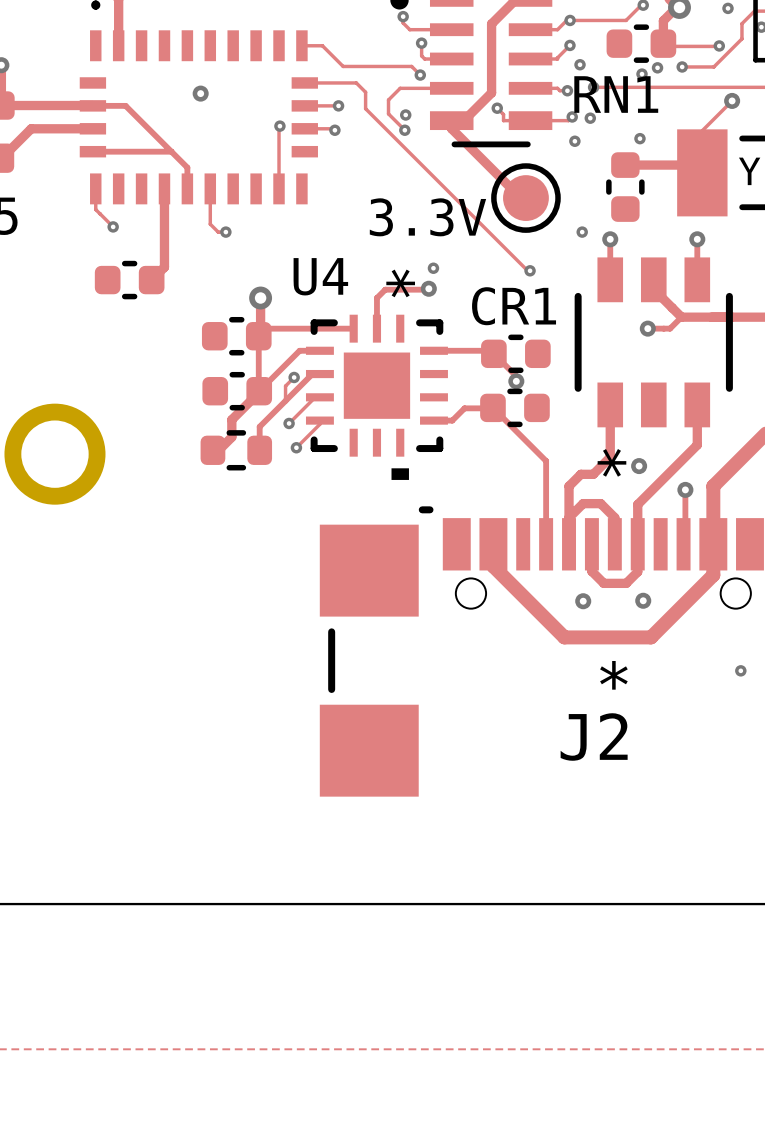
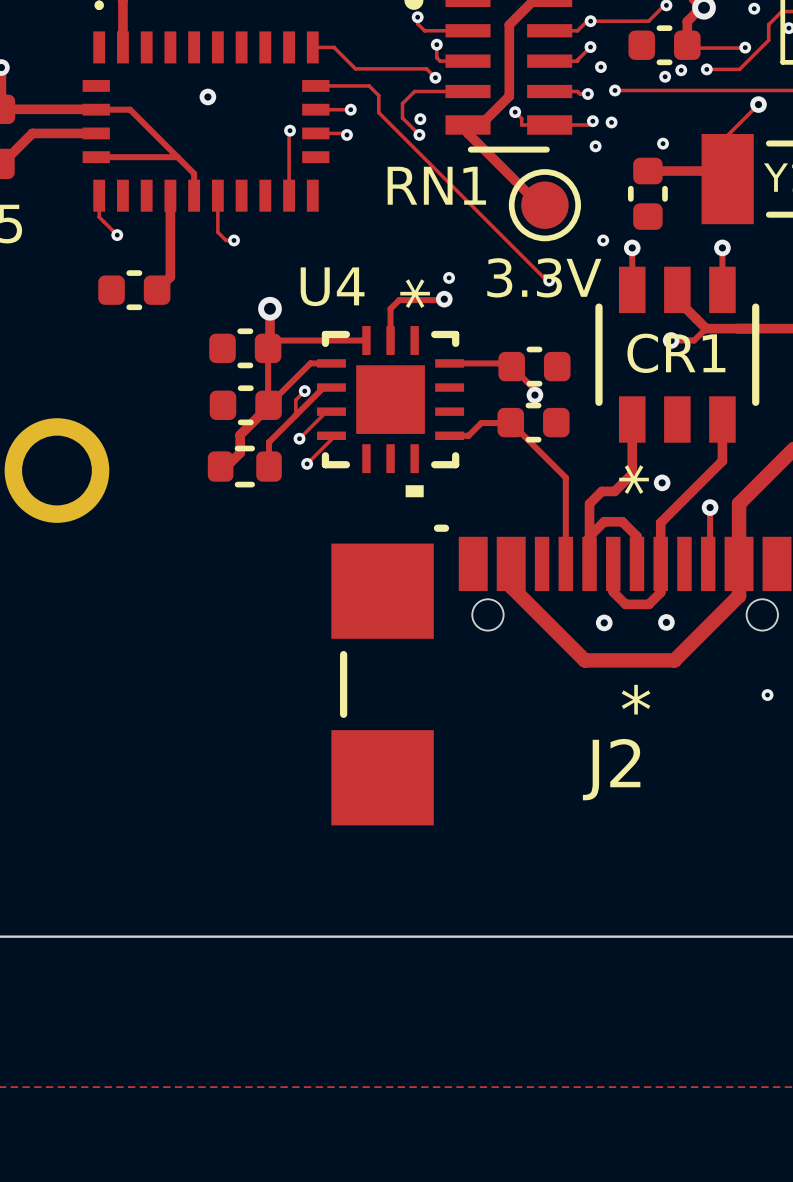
RN1 name position: RN1 (616, 94) -> RN1 (436, 185)
3.3V name position: 3.3V (427, 217) -> 3.3V (544, 277)
CR1 name position: CR1 (514, 306) -> CR1 (676, 353)

